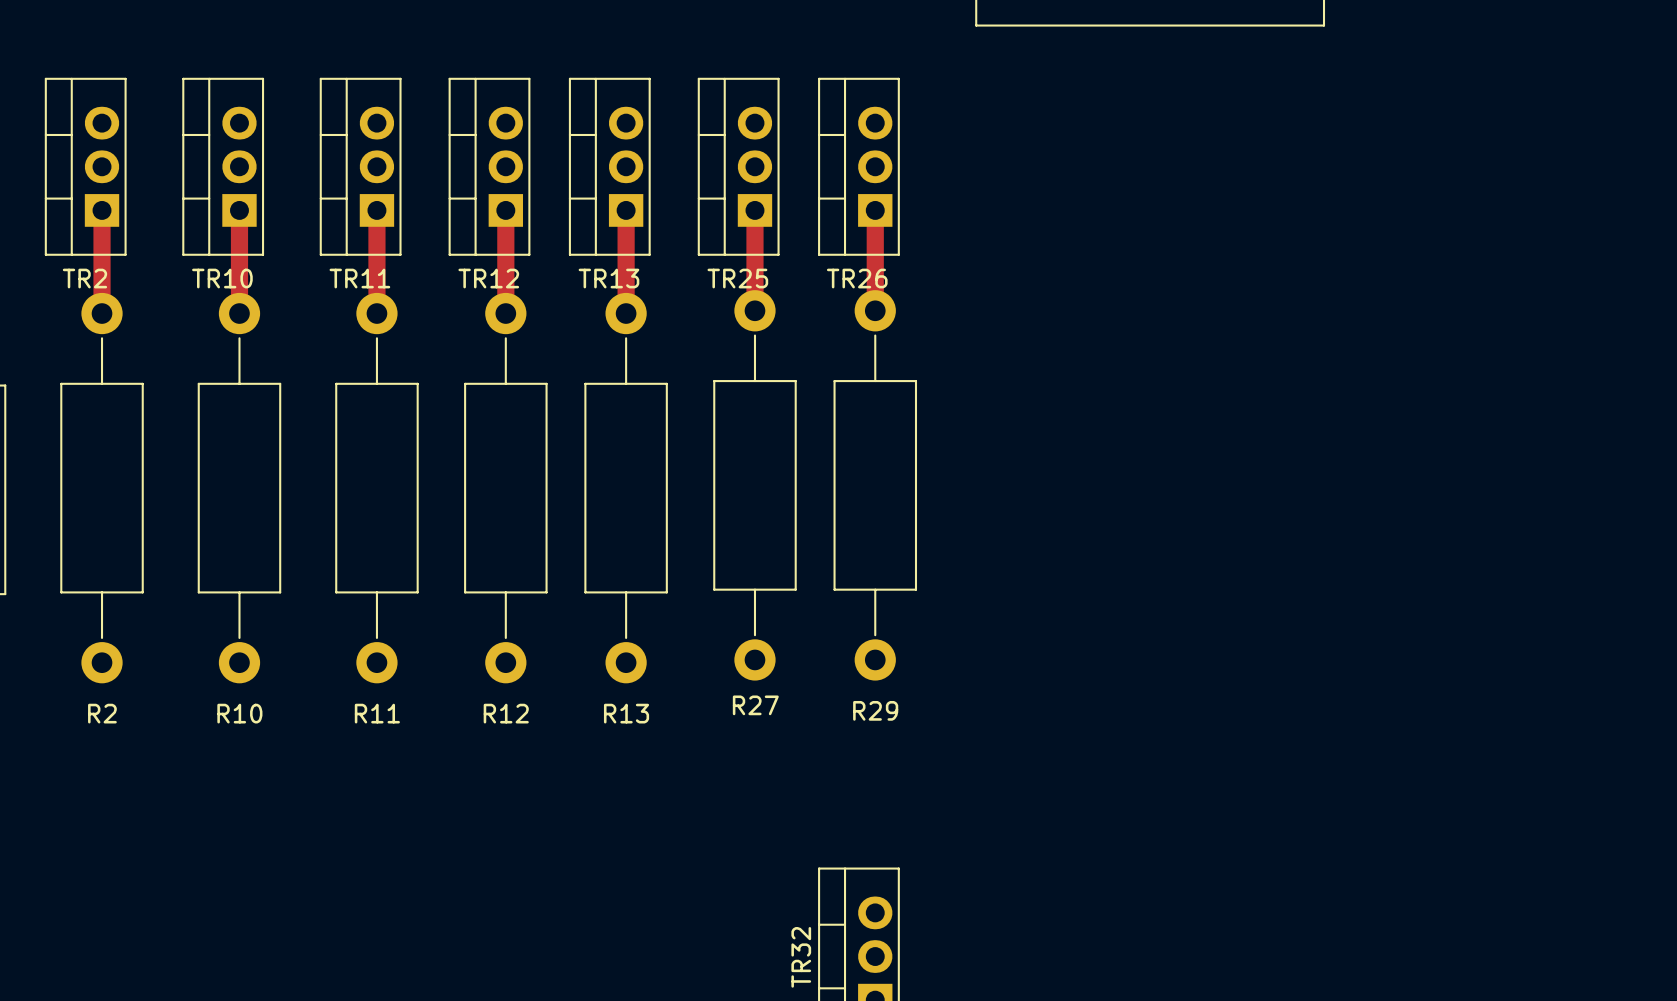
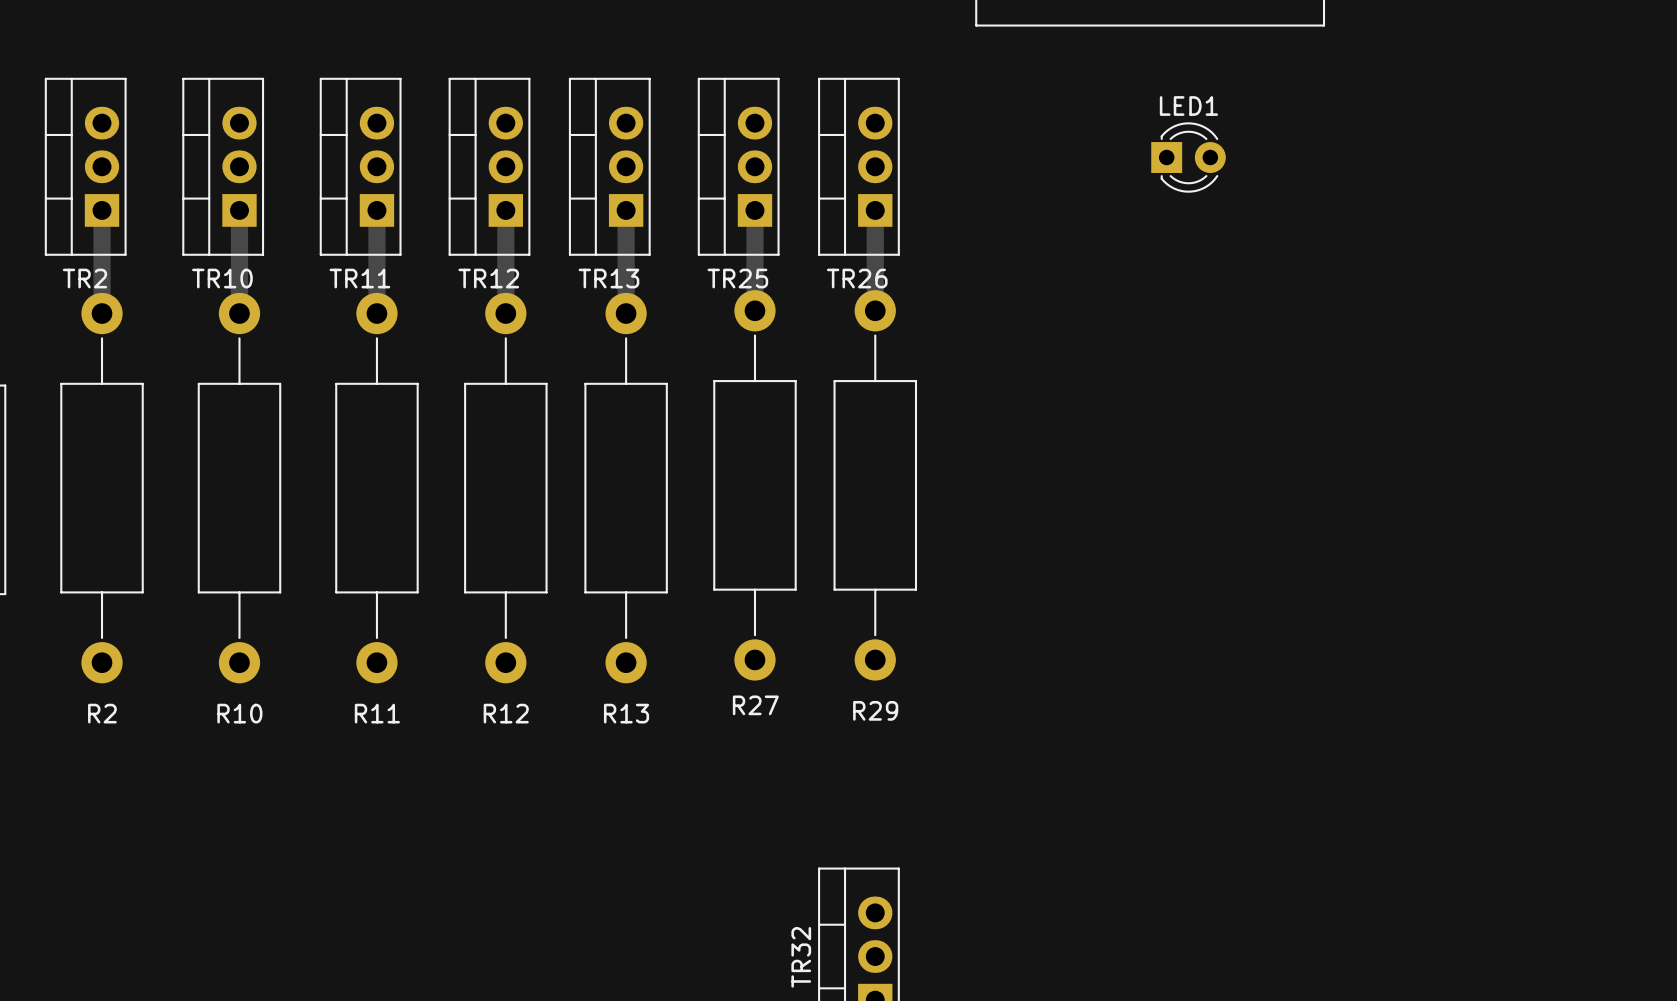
LED1: none -> (1188, 157)

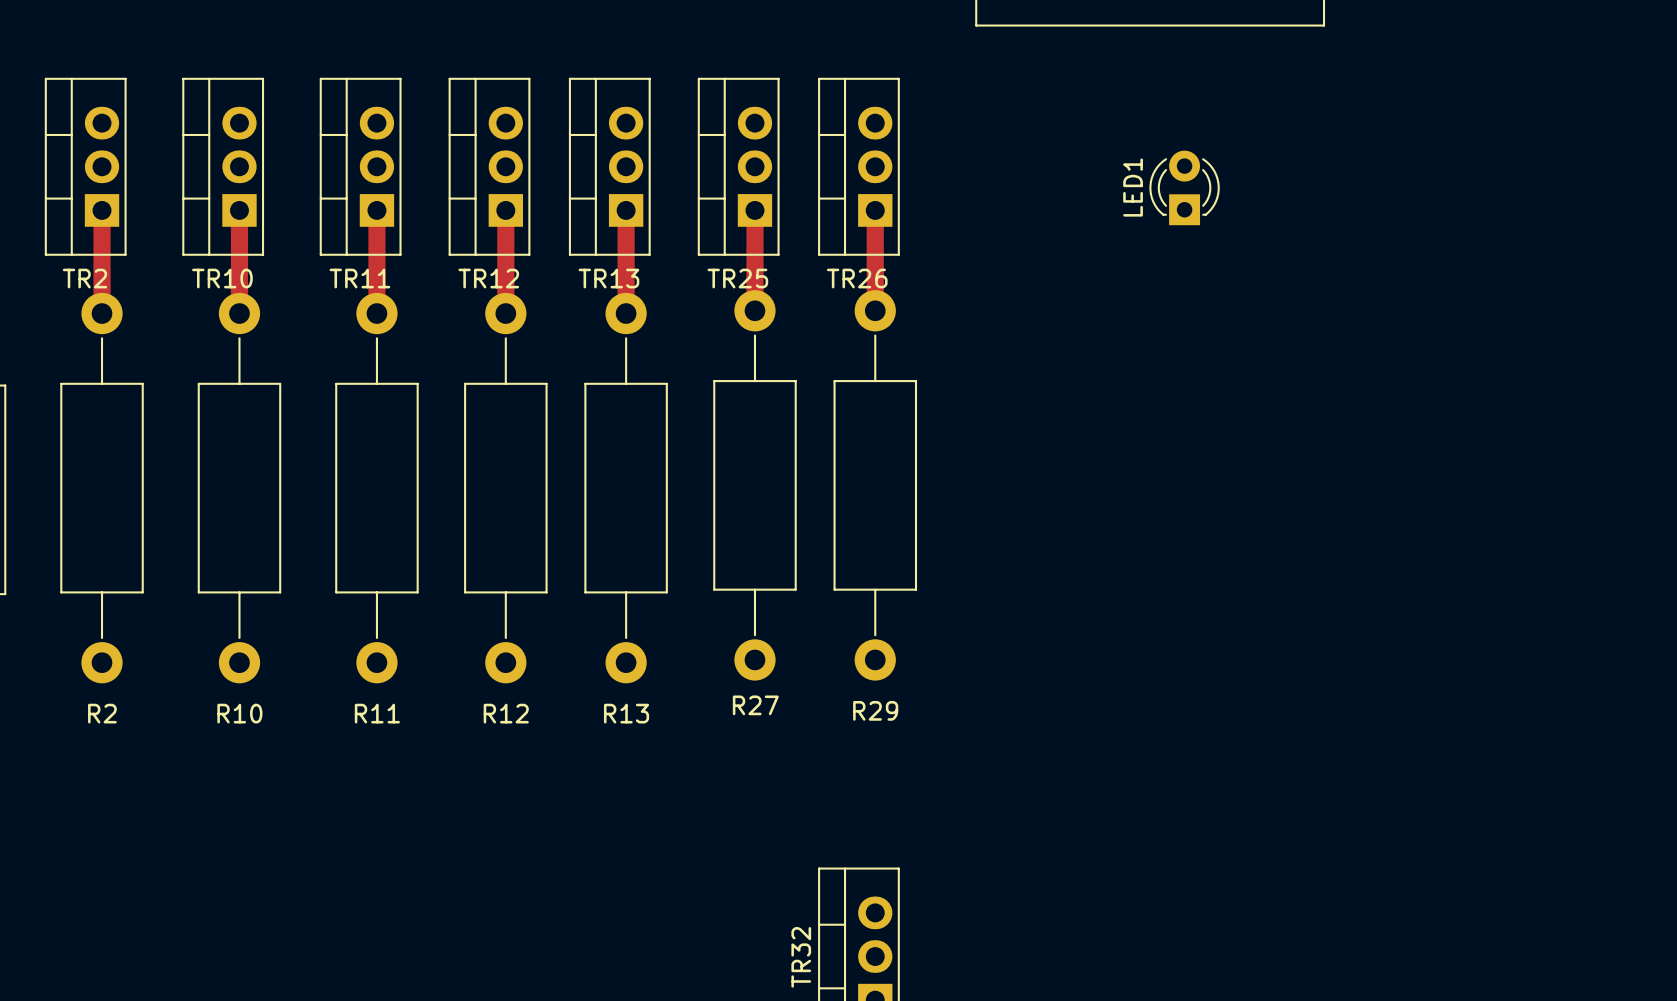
LED1 rotation: 0° (1188, 157) -> 90° counterclockwise (1184, 187)

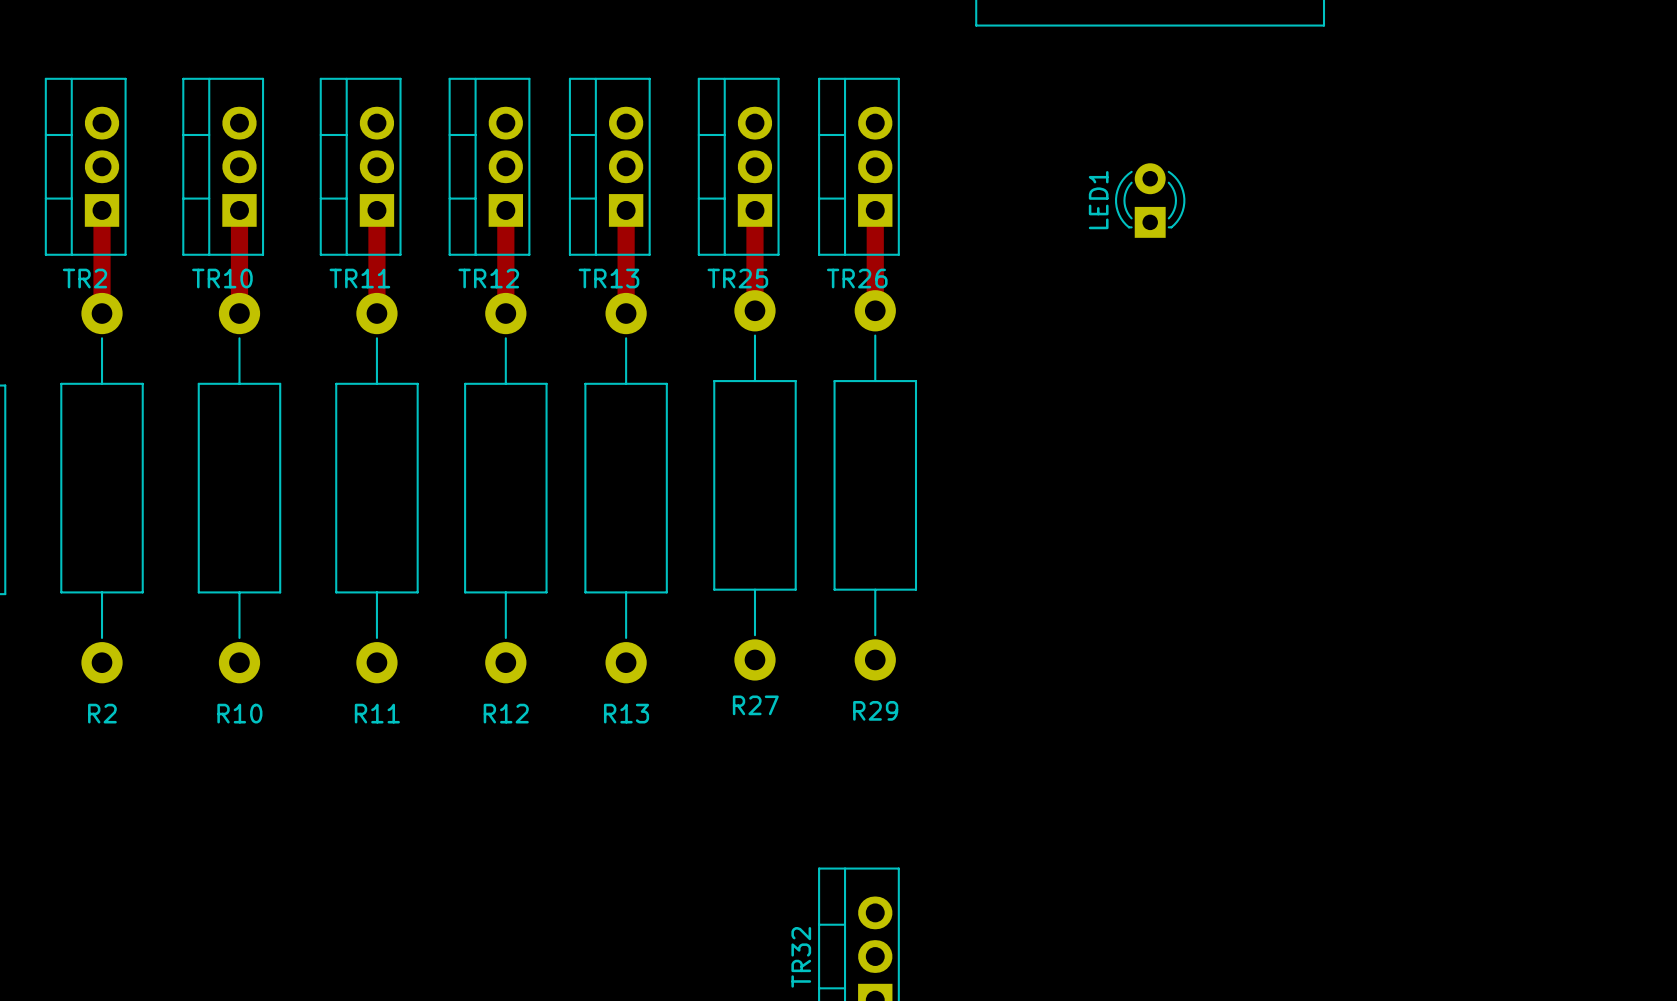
LED1 position: (1184, 187) -> (1150, 200)

